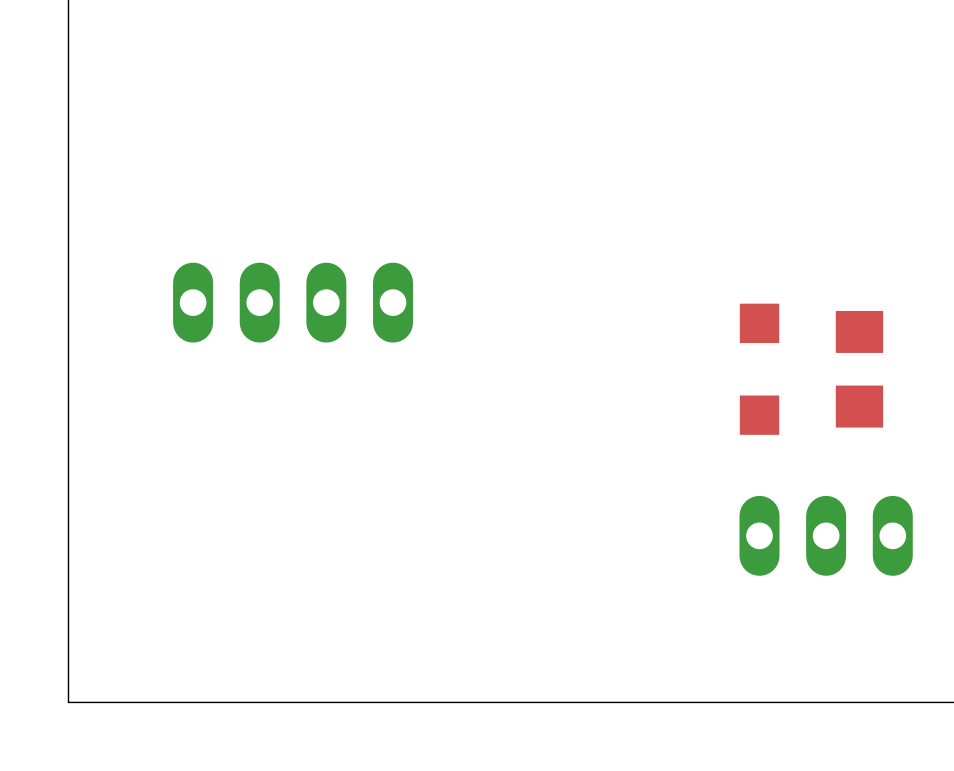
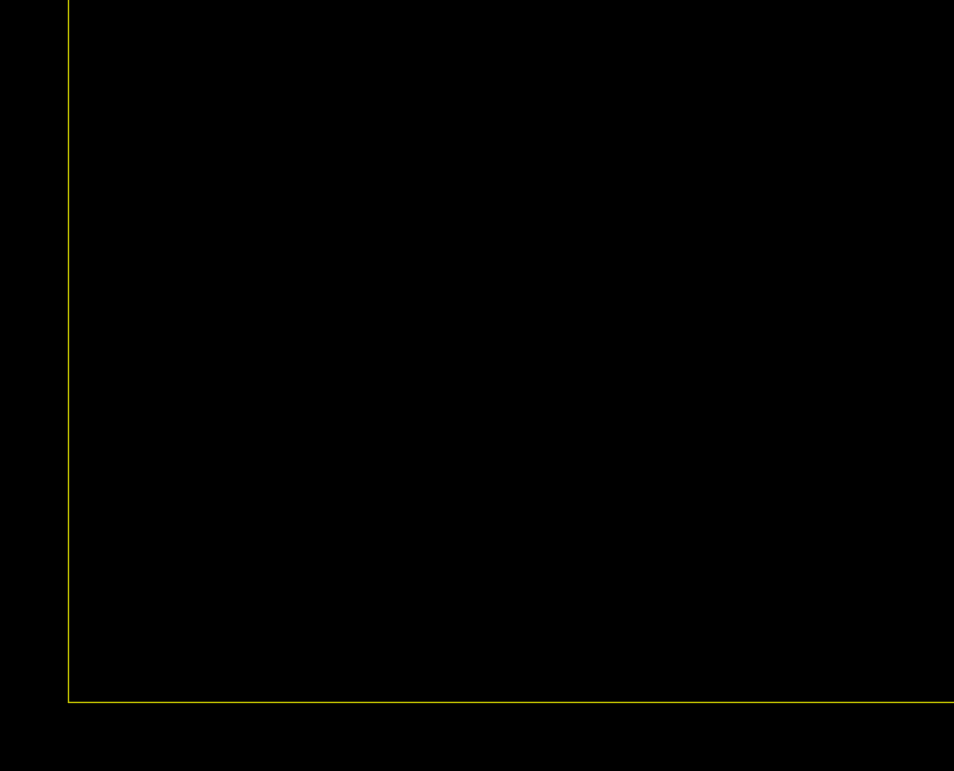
part: (293, 302) -> none
part: (759, 369) -> none
part: (859, 369) -> none
part: (826, 535) -> none

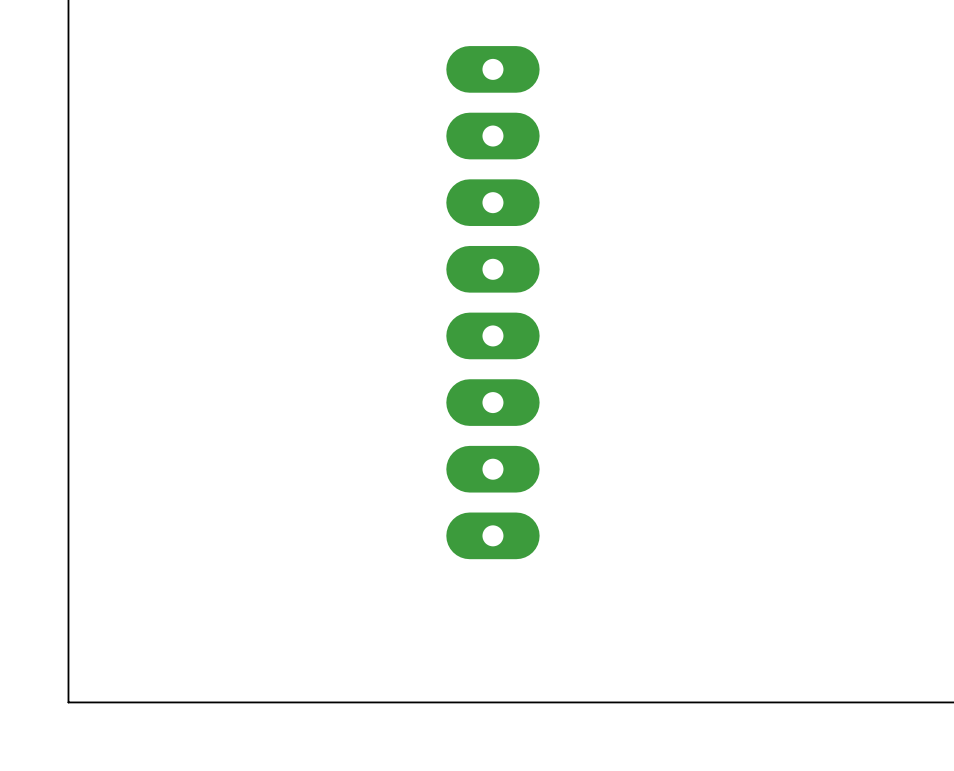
part: none -> (492, 302)

